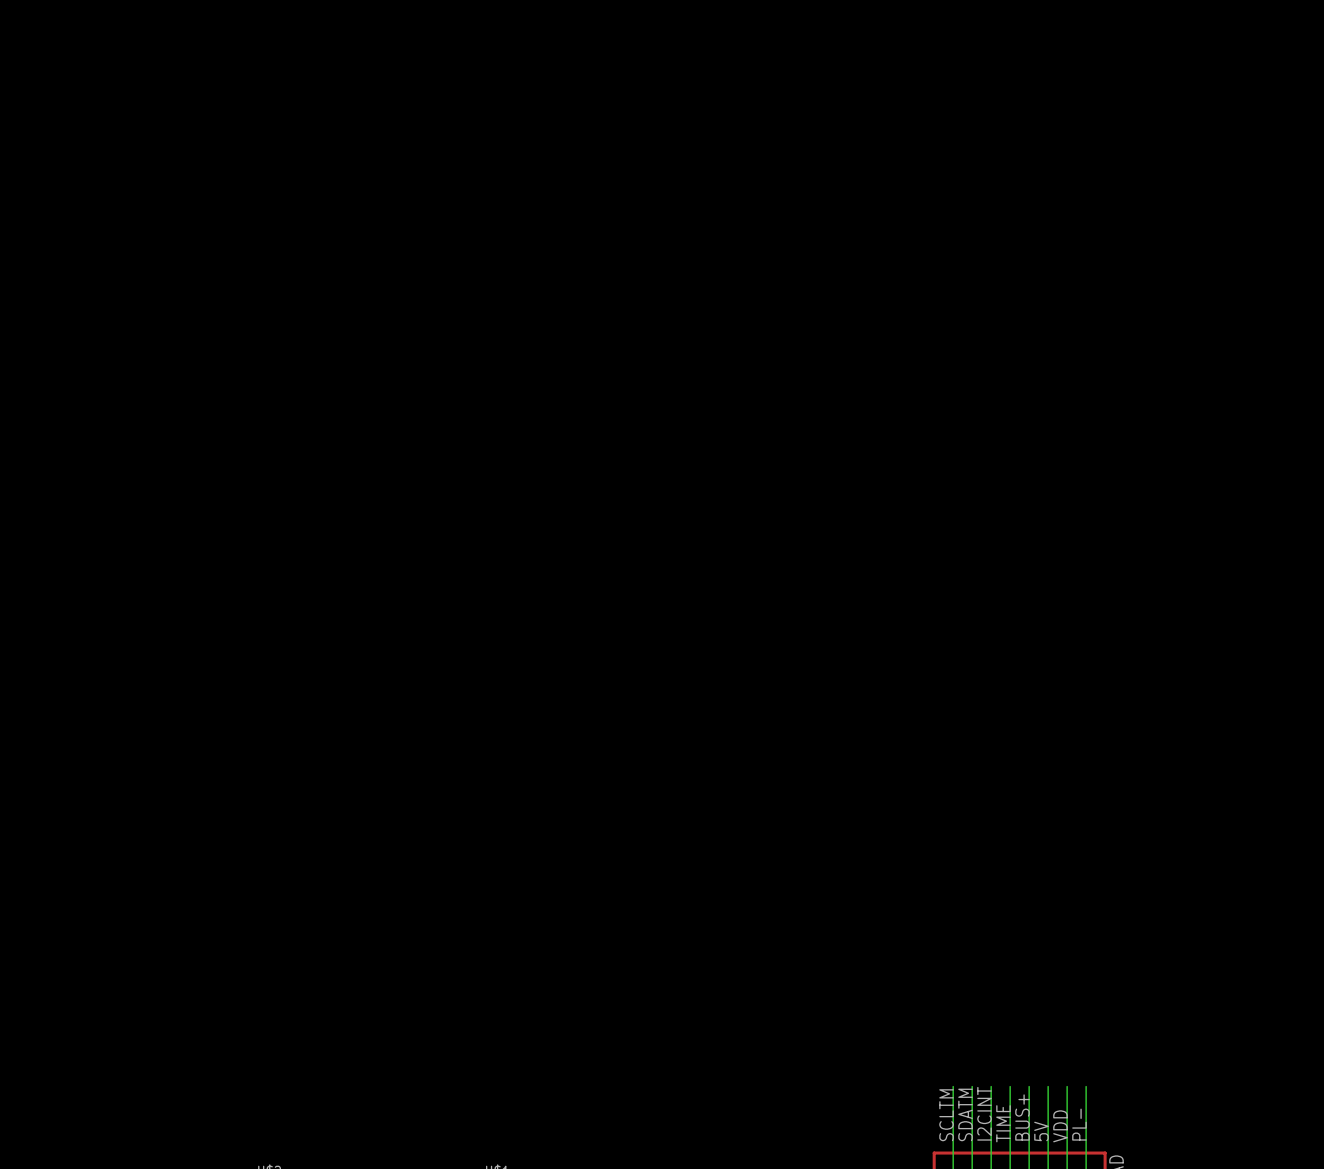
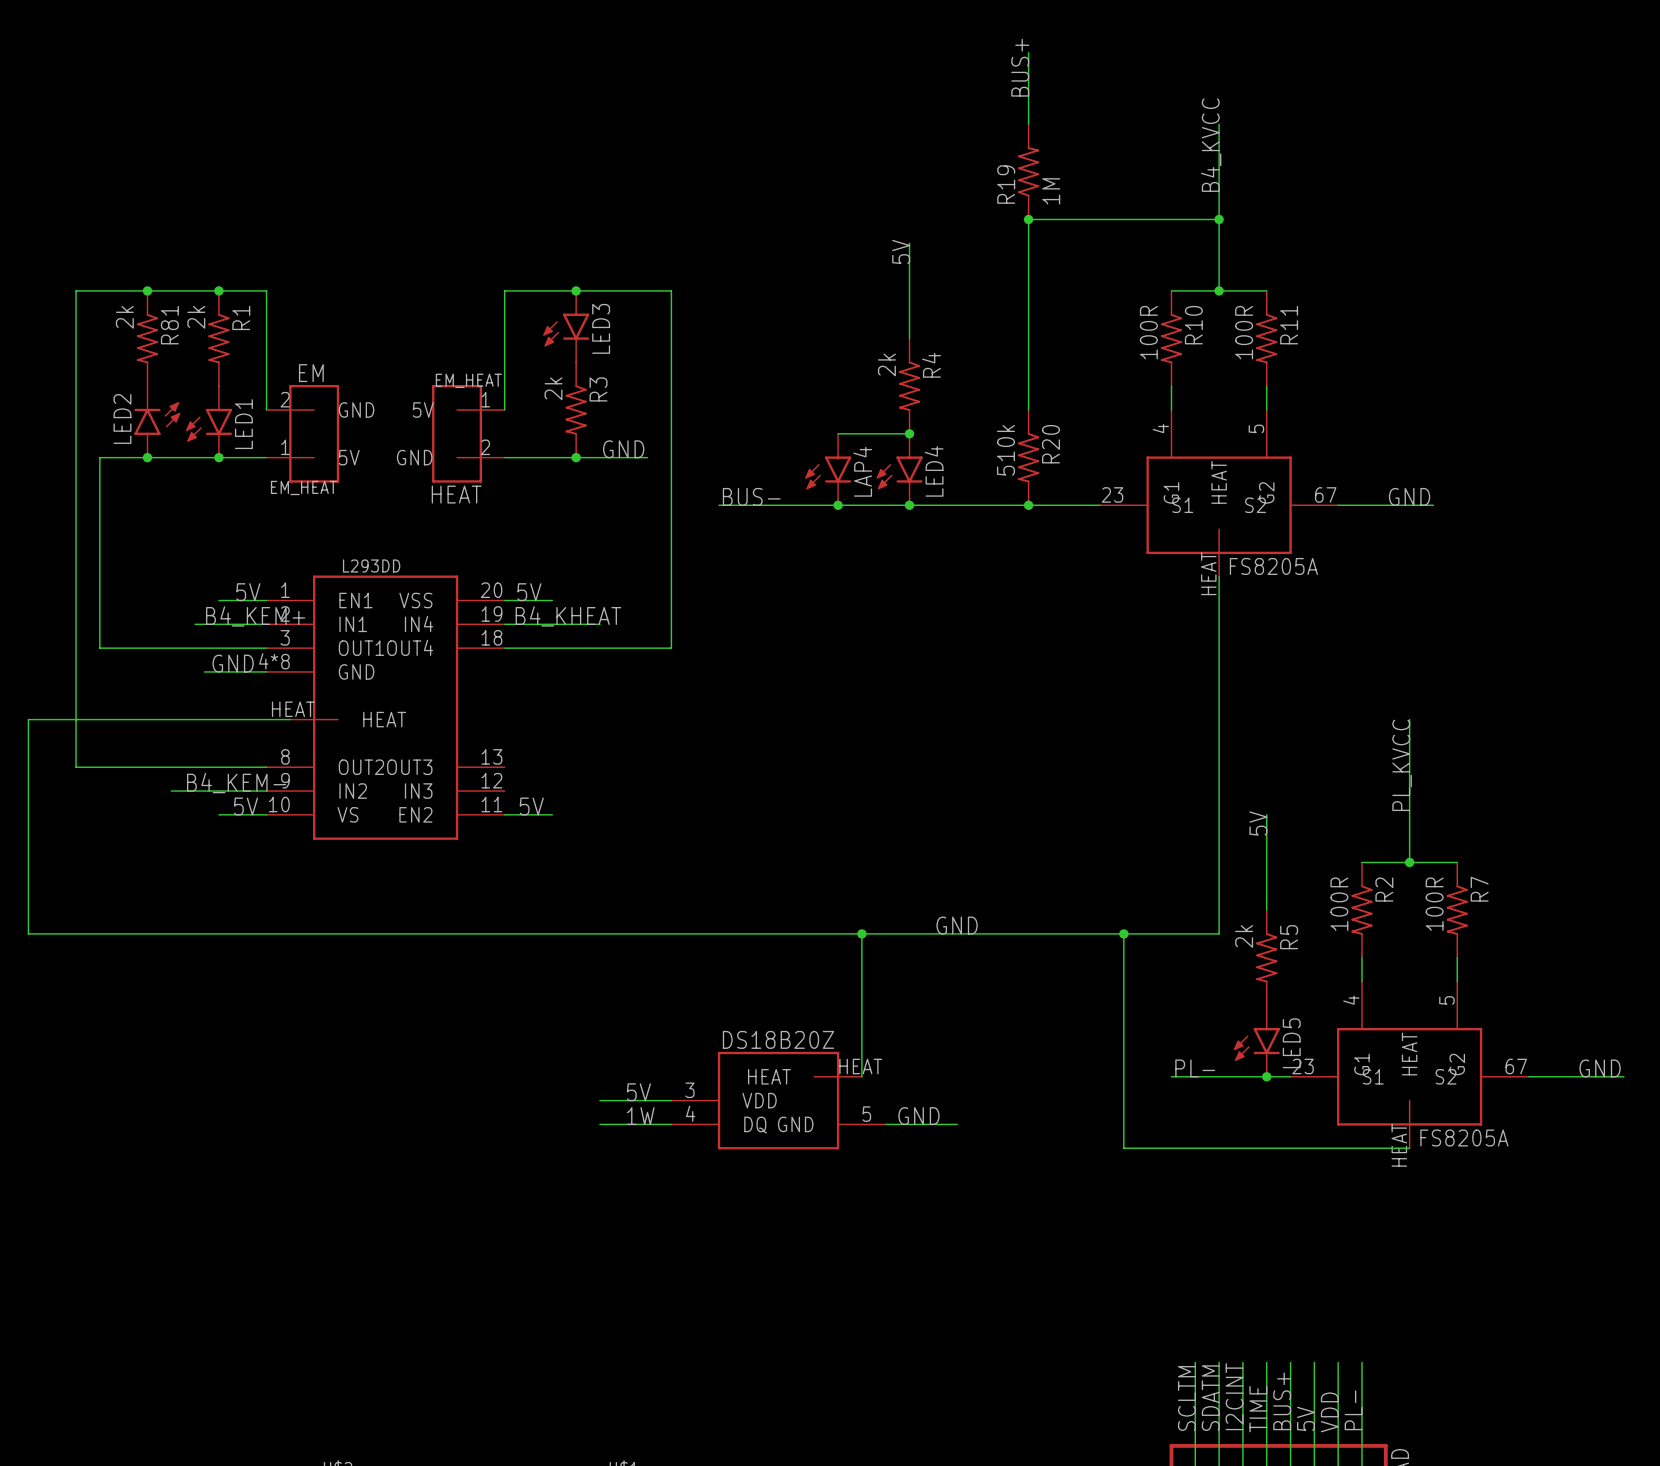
wire: none -> (1028, 52) (1028, 124)
label: none -> BUS+ (1020, 67)
wire: none -> (1219, 124) (1219, 290)
label: none -> B4_KVCC (1211, 145)
R19: none -> 1M (1028, 171)
junction: none -> (1028, 219)
wire: none -> (1219, 219) (1028, 219) (1028, 410)
junction: none -> (1219, 219)
wire: none -> (909, 243) (909, 338)
label: none -> 5V (901, 251)
junction: none -> (147, 290)
junction: none -> (218, 290)
junction: none -> (576, 290)
wire: none -> (1171, 290) (1266, 290)
junction: none -> (1219, 290)
LED3: none -> (566, 326)
R81: none -> 2k (147, 338)
R1: none -> 2k (218, 338)
R10: none -> 100R (1171, 338)
R11: none -> 100R (1266, 338)
text: none -> EM (311, 373)
R4: none -> 2k (909, 386)
wire: none -> (1171, 386) (1171, 410)
wire: none -> (1266, 386) (1266, 410)
wire: none -> (266, 410) (266, 290) (76, 290) (76, 767) (266, 767)
wire: none -> (504, 410) (504, 290) (671, 290) (671, 648) (504, 648)
R3: none -> 2k (576, 410)
LED2: none -> (157, 421)
LED1: none -> (209, 421)
part: none -> (302, 433)
part: none -> (468, 433)
wire: none -> (838, 433) (909, 433)
junction: none -> (909, 433)
label: none -> GND (623, 449)
junction: none -> (147, 457)
junction: none -> (218, 457)
wire: none -> (266, 457) (99, 457) (99, 648) (266, 648)
wire: none -> (504, 457) (647, 457)
junction: none -> (576, 457)
R20: none -> 510k (1028, 457)
LAP4: none -> (828, 469)
LED4: none -> (899, 469)
part: none -> (1219, 493)
text: none -> HEAT (456, 494)
label: none -> BUS- (751, 496)
label: none -> GND (1409, 496)
wire: none -> (719, 505) (1100, 505)
junction: none -> (838, 505)
junction: none -> (909, 505)
junction: none -> (1028, 505)
wire: none -> (1338, 505) (1433, 505)
wire: none -> (1219, 576) (1219, 933) (28, 933) (28, 719) (290, 719)
label: none -> 5V (248, 592)
label: none -> 5V (529, 592)
wire: none -> (218, 600) (266, 600)
wire: none -> (504, 600) (552, 600)
label: none -> B4_KEM+ (255, 616)
label: none -> B4_KHEAT (568, 616)
wire: none -> (195, 624) (266, 624)
wire: none -> (504, 624) (599, 624)
label: none -> GND (233, 663)
wire: none -> (204, 671) (266, 671)
part: none -> (385, 707)
wire: none -> (1409, 719) (1409, 862)
label: none -> PL_KVCC (1402, 765)
label: none -> B4_KEM- (236, 783)
wire: none -> (171, 791) (266, 791)
label: none -> 5V (245, 806)
label: none -> 5V (531, 806)
wire: none -> (218, 814) (266, 814)
wire: none -> (504, 814) (552, 814)
wire: none -> (1266, 814) (1266, 910)
label: none -> 5V (1258, 823)
wire: none -> (1361, 862) (1457, 862)
junction: none -> (1409, 862)
R2: none -> 100R (1361, 910)
R7: none -> 100R (1457, 910)
label: none -> GND (957, 925)
wire: none -> (861, 933) (861, 1076)
junction: none -> (861, 933)
wire: none -> (1123, 933) (1123, 1148) (1409, 1148)
junction: none -> (1123, 933)
R5: none -> 2k (1266, 957)
wire: none -> (1361, 957) (1361, 981)
wire: none -> (1457, 957) (1457, 981)
LED5: none -> (1256, 1041)
part: none -> (1409, 1064)
label: none -> PL- (1195, 1068)
label: none -> GND (1600, 1068)
wire: none -> (1171, 1076) (1290, 1076)
junction: none -> (1266, 1076)
wire: none -> (1528, 1076) (1623, 1076)
label: none -> 5V (638, 1092)
wire: none -> (599, 1100) (671, 1100)
part: none -> (778, 1100)
label: none -> 1W (640, 1116)
label: none -> GND (918, 1116)
wire: none -> (599, 1124) (671, 1124)
wire: none -> (885, 1124) (957, 1124)

